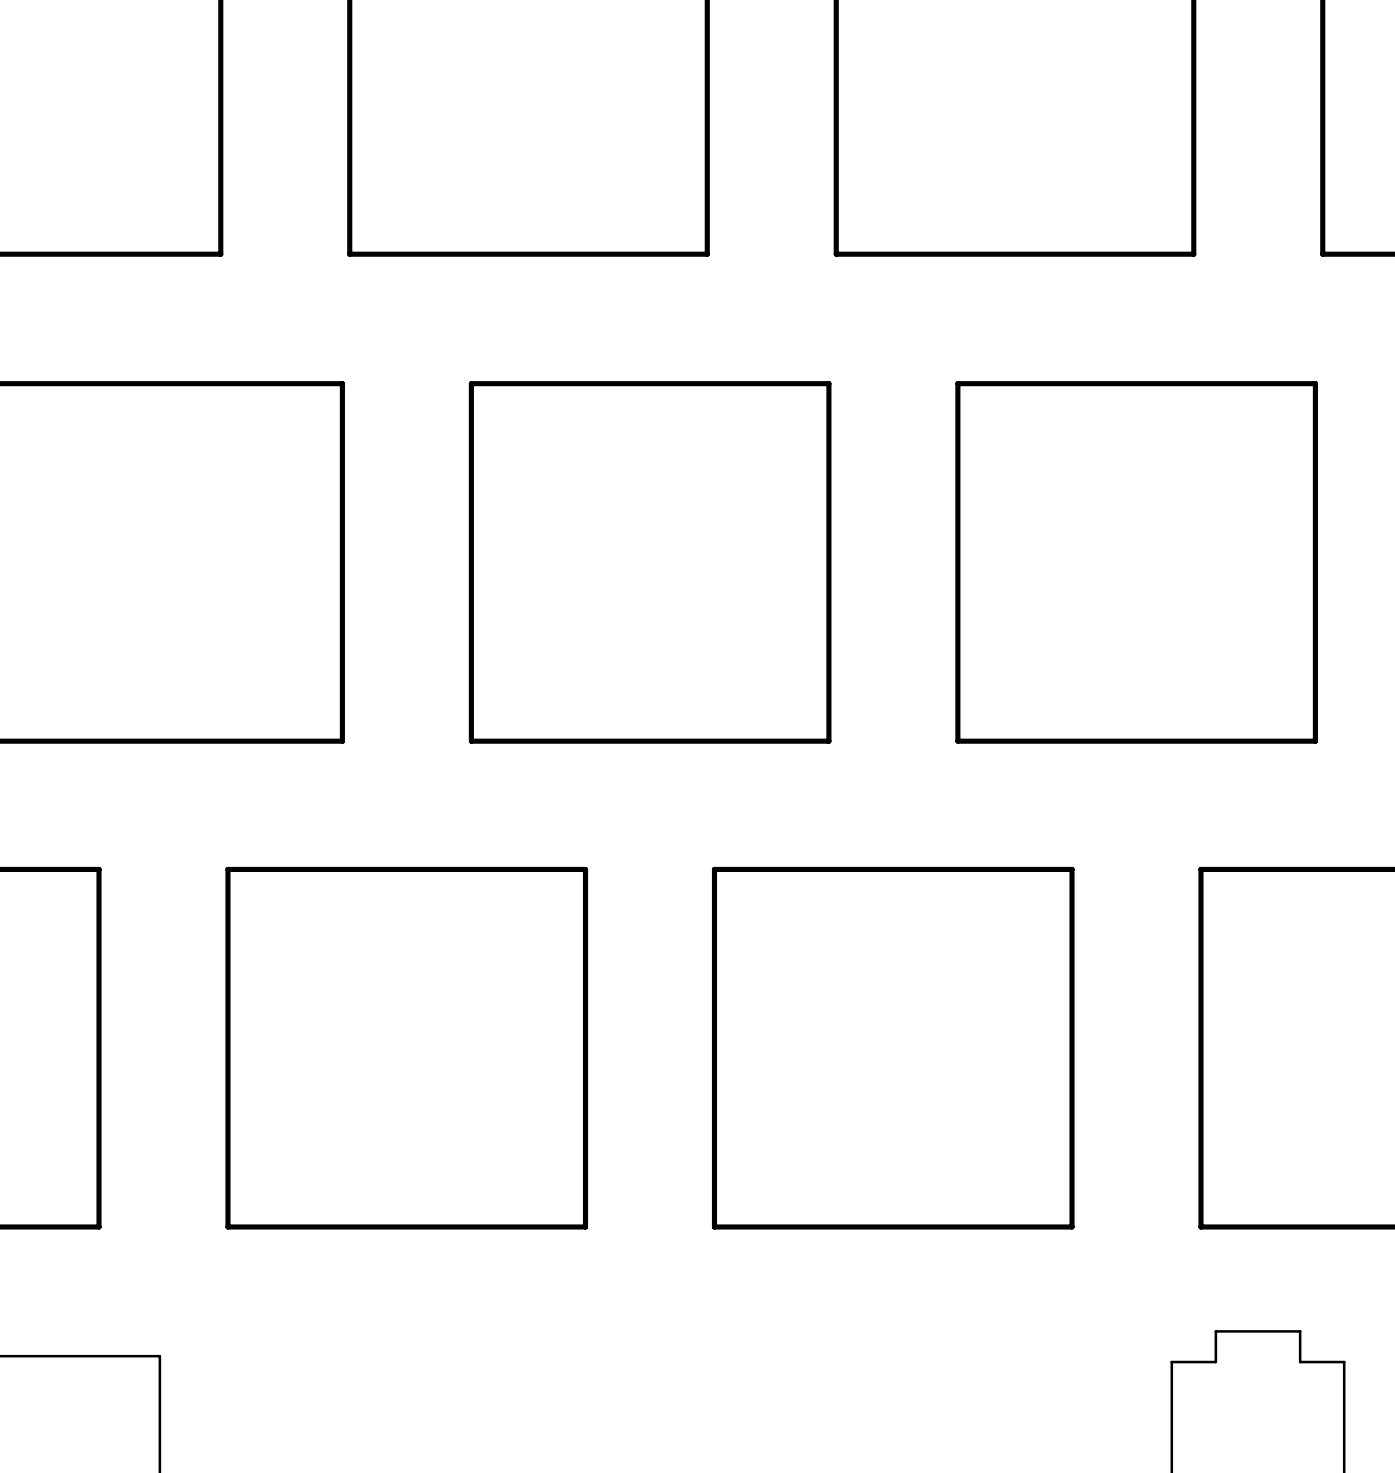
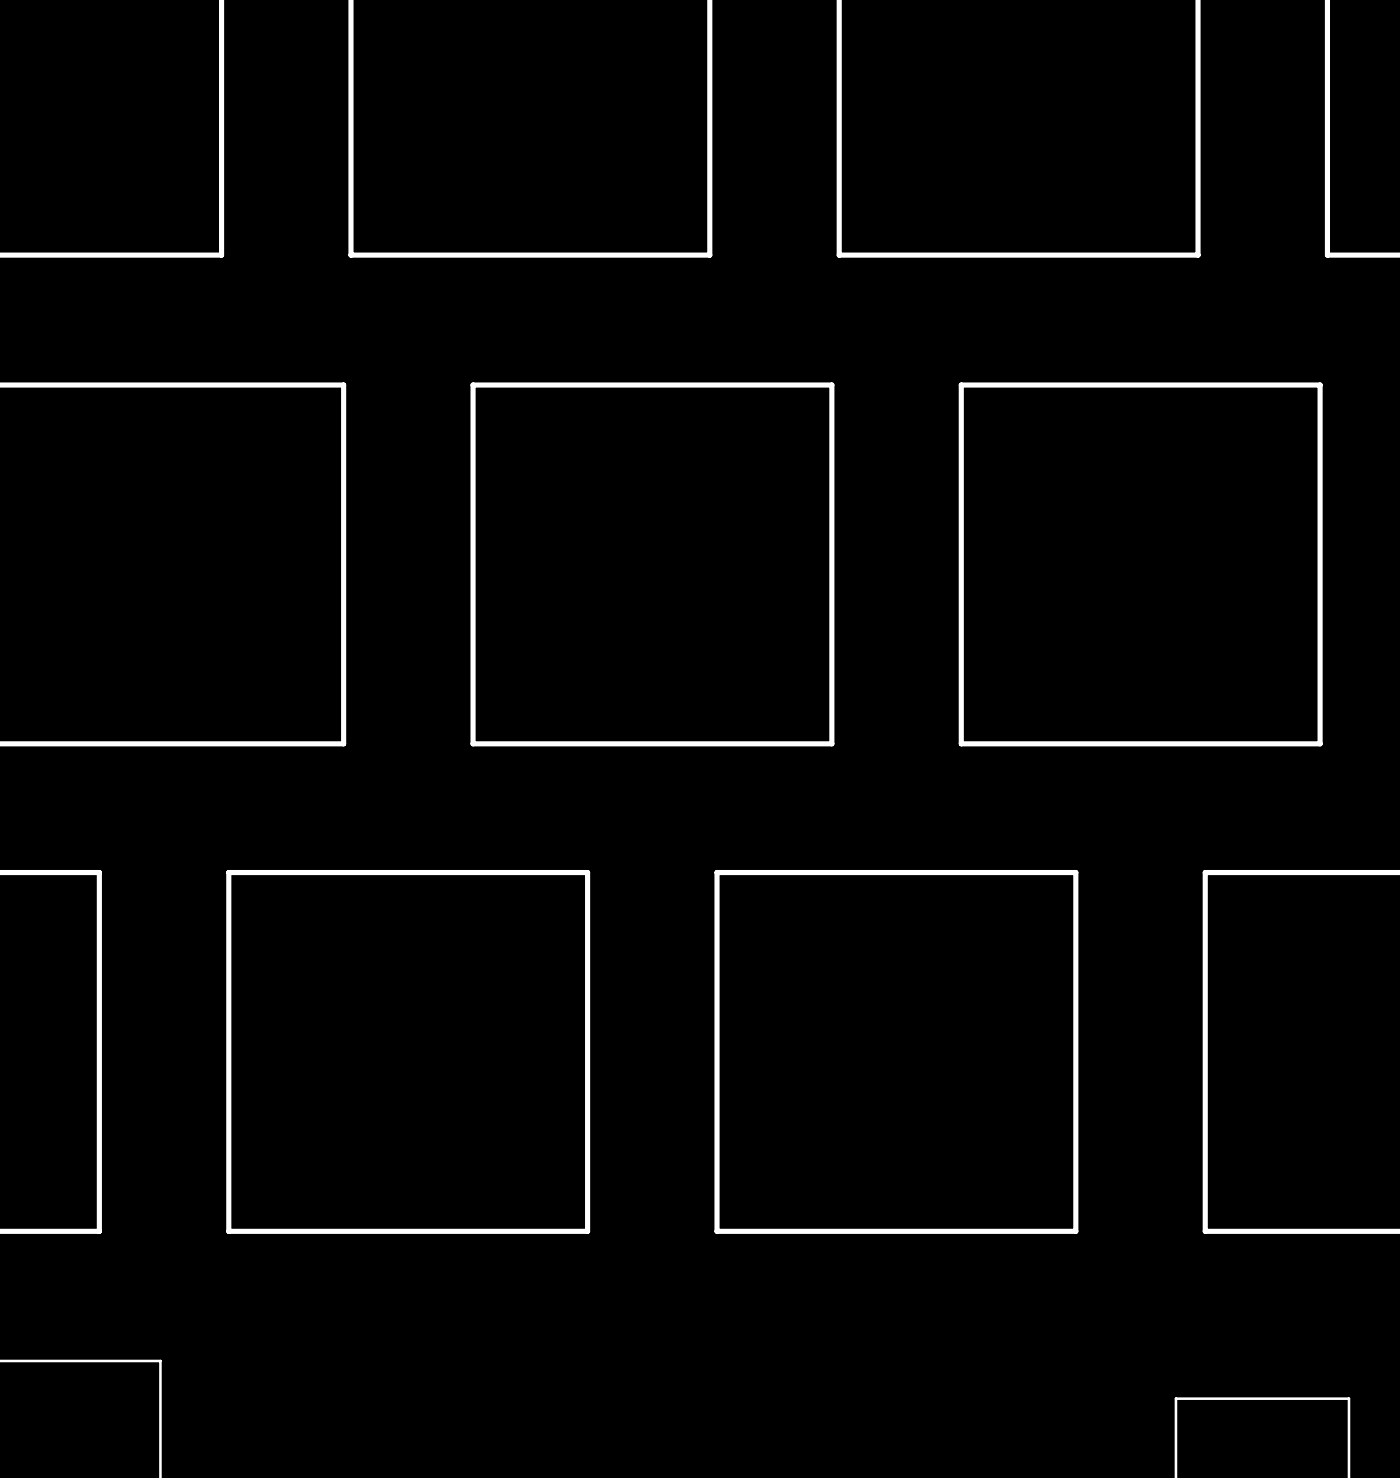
board edge: (1171, 1393) (1171, 1362) (1215, 1362) (1215, 1331) (1300, 1331) (1300, 1362) (1344, 1362) (1344, 1393) -> (1175, 1398) (1348, 1398)

